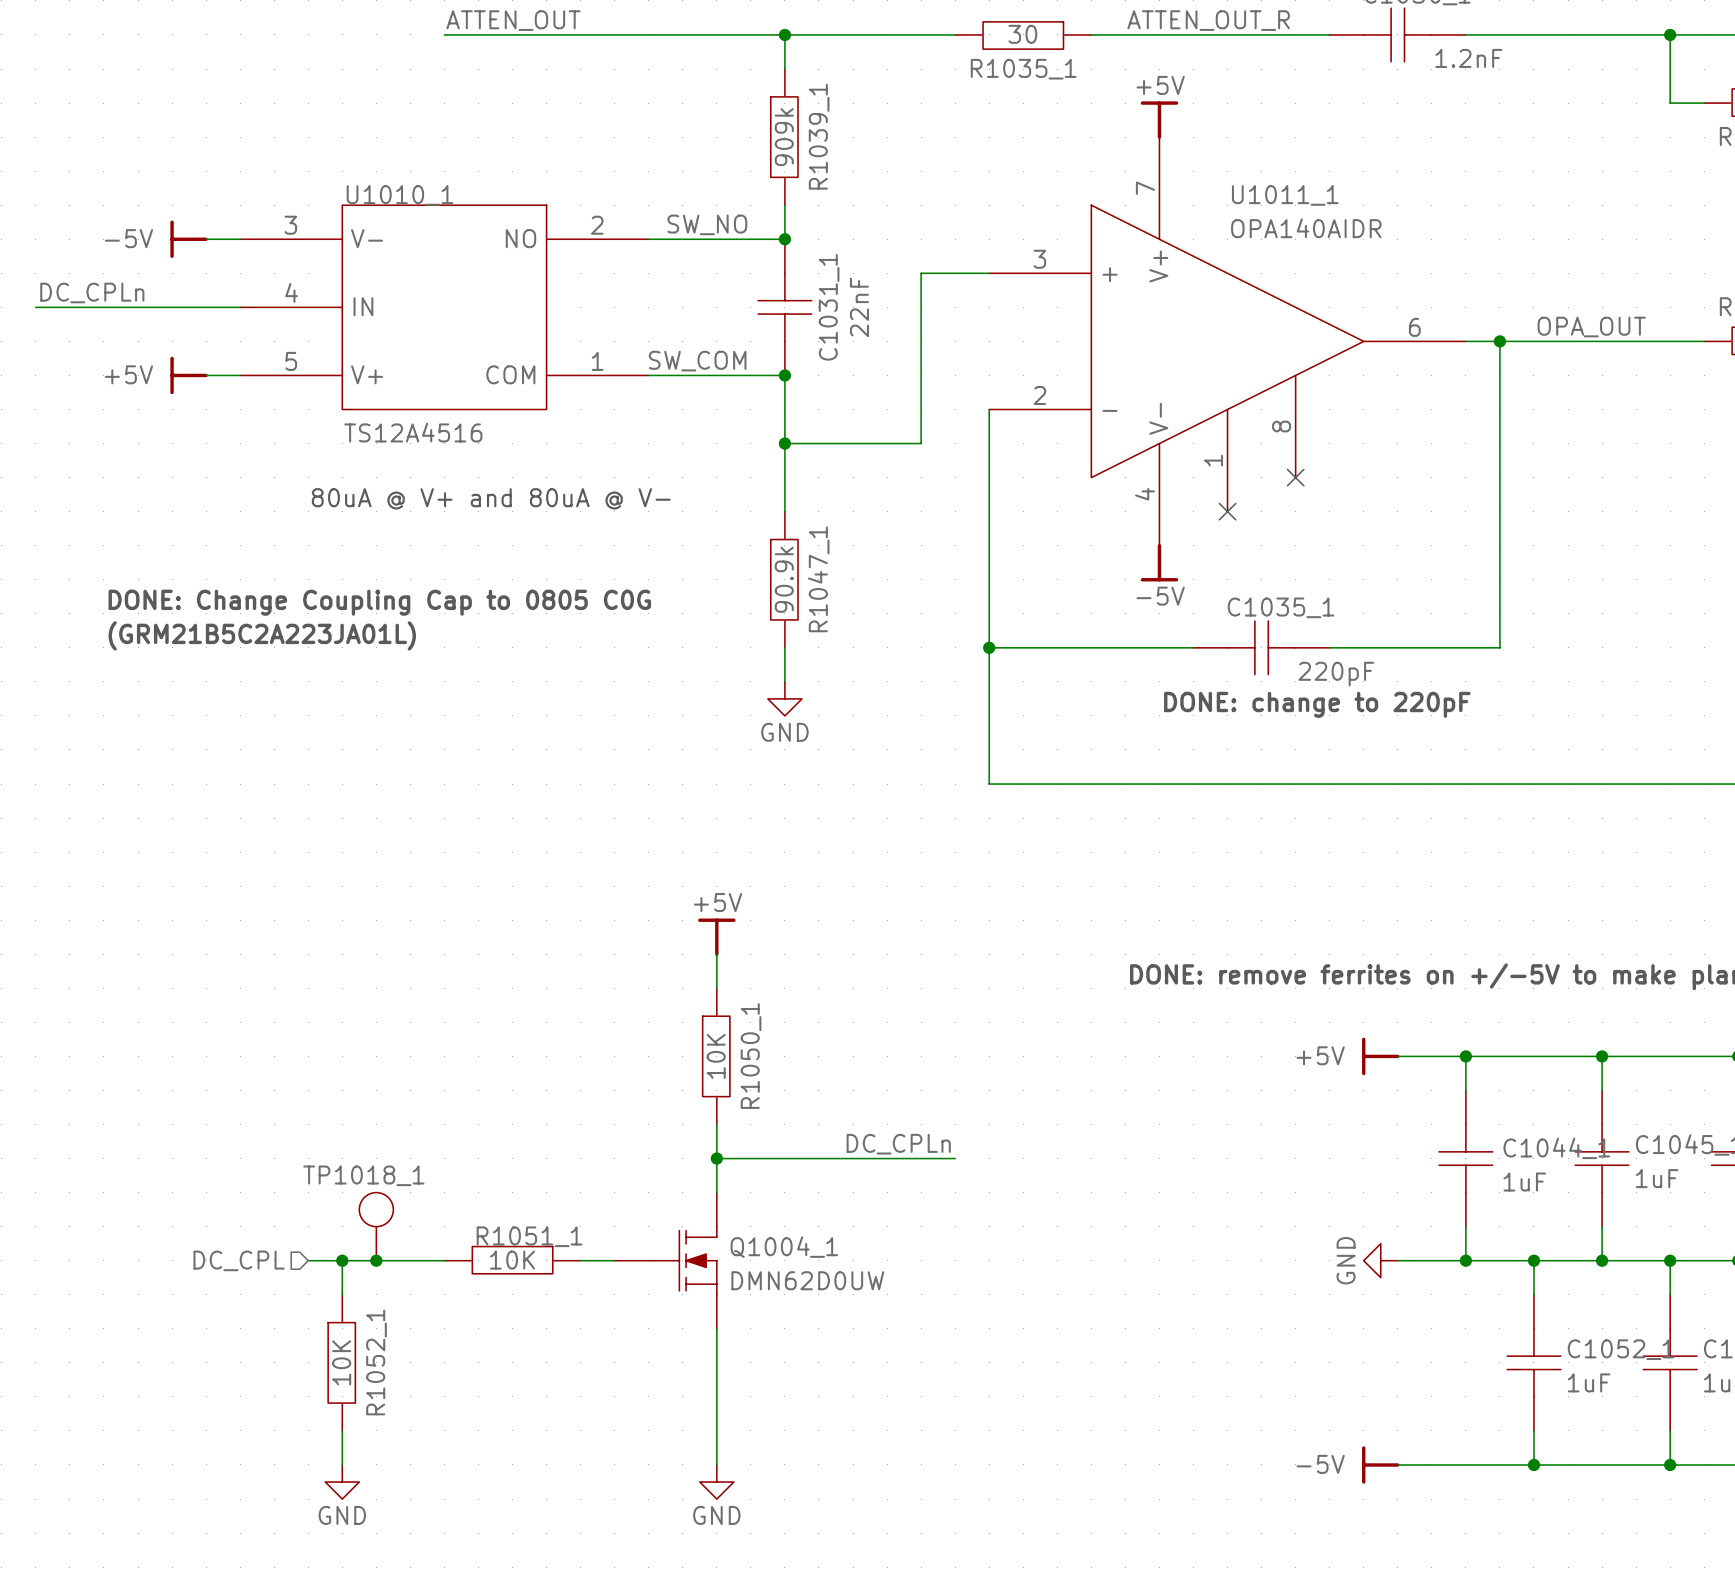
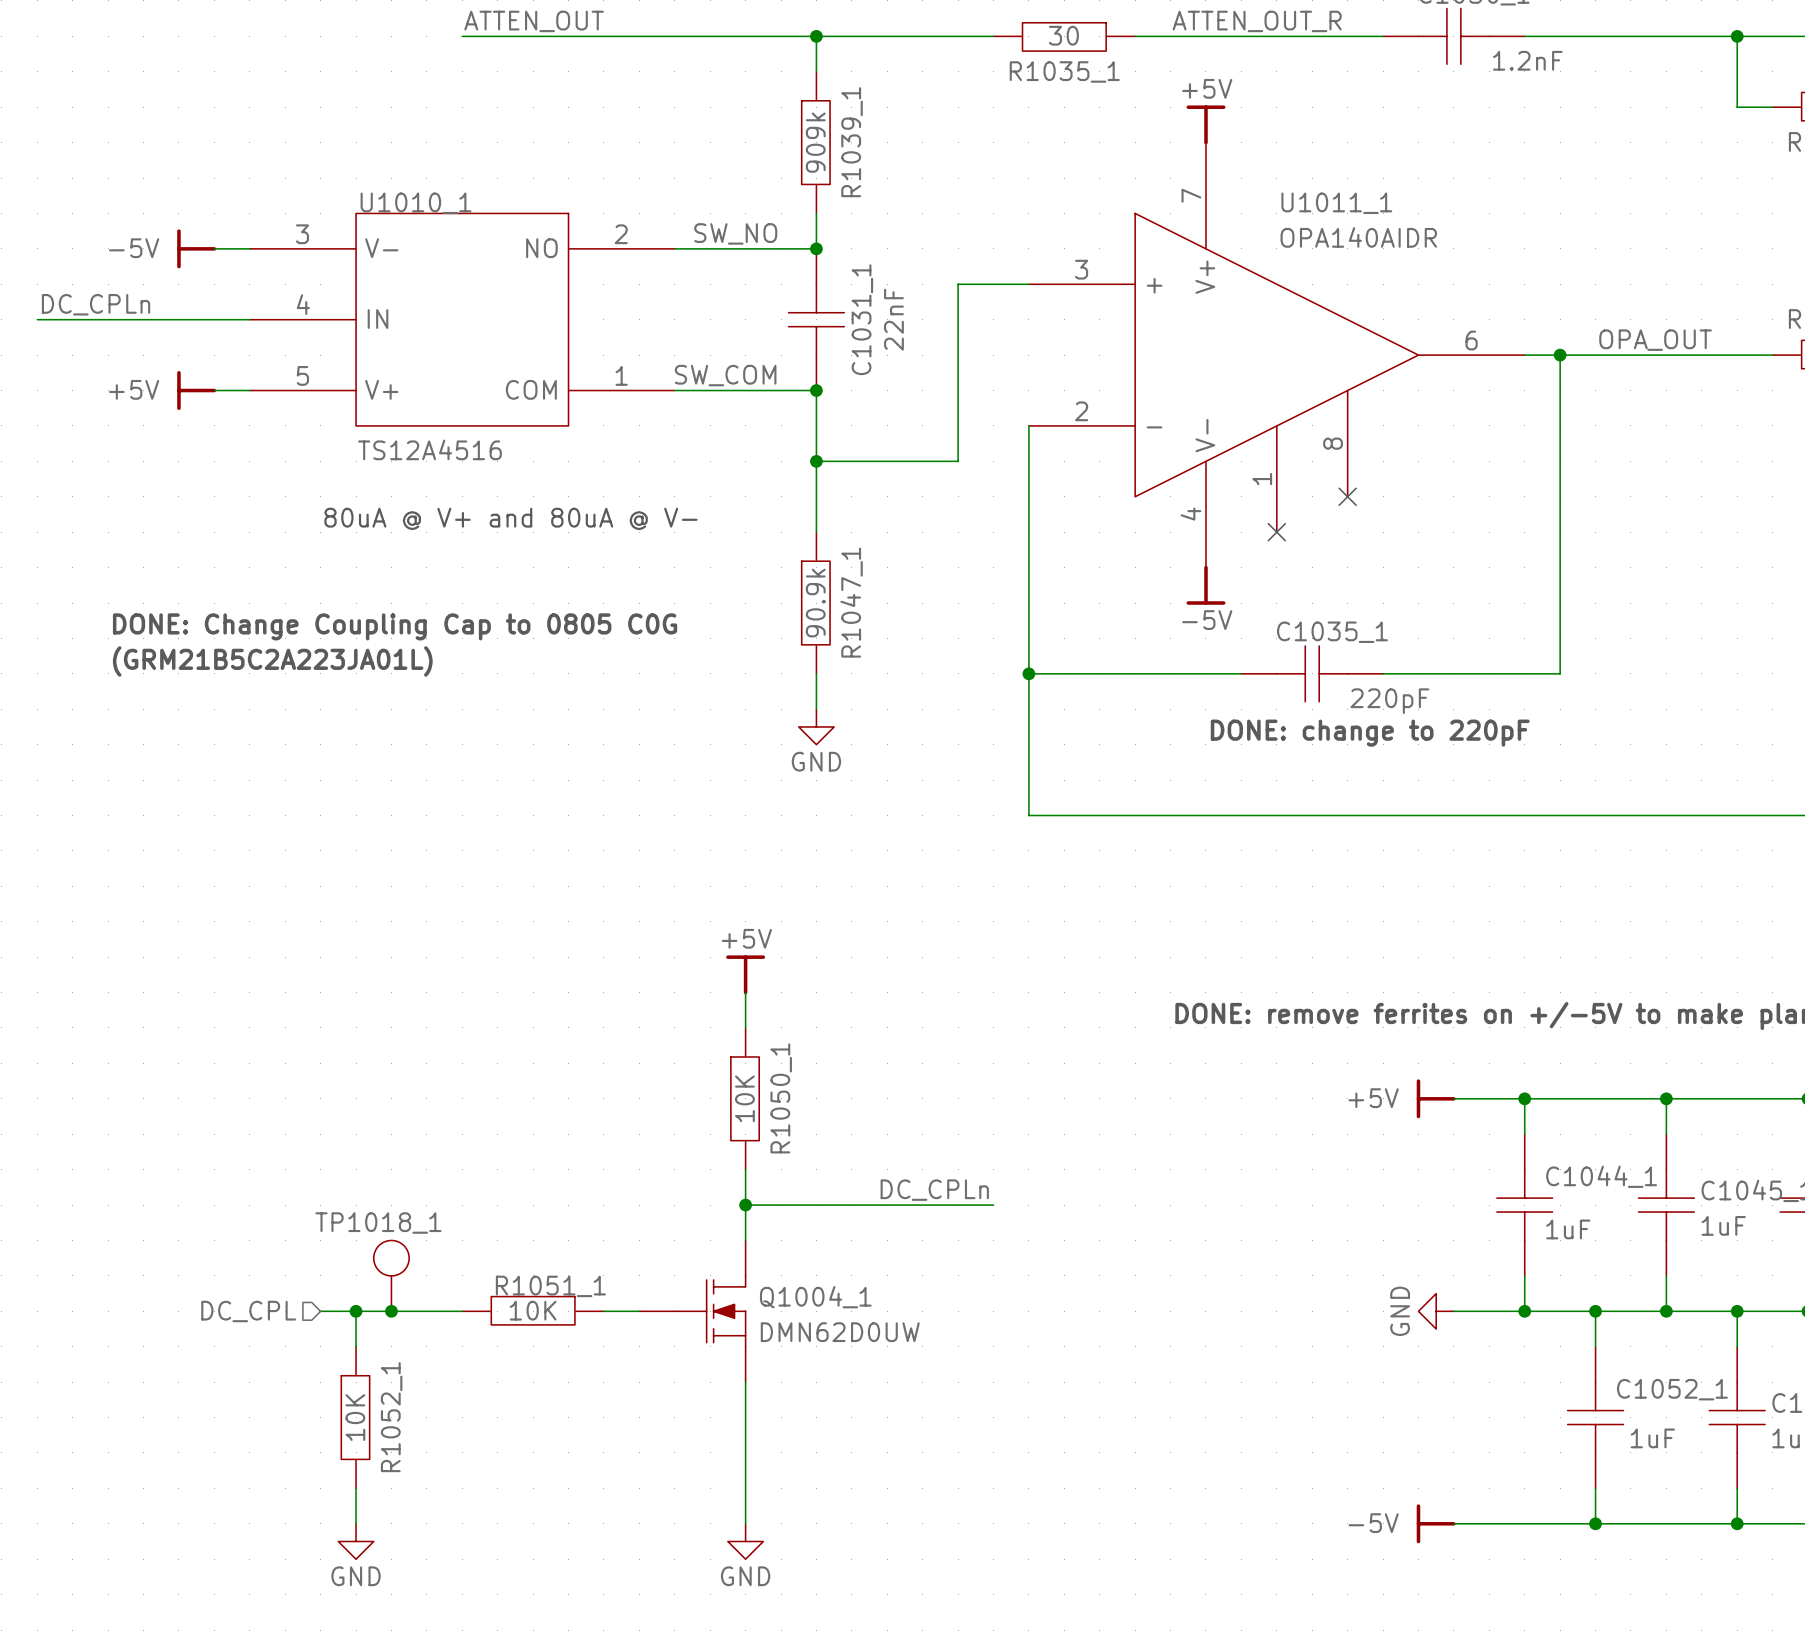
C1044_1 name position: C1044_1 (1556, 1148) -> C1044_1 (1601, 1176)
C1044_1 value position: 1uF (1524, 1182) -> 1uF (1568, 1229)
C1052_1 name position: C1052_1 (1621, 1349) -> C1052_1 (1672, 1389)

